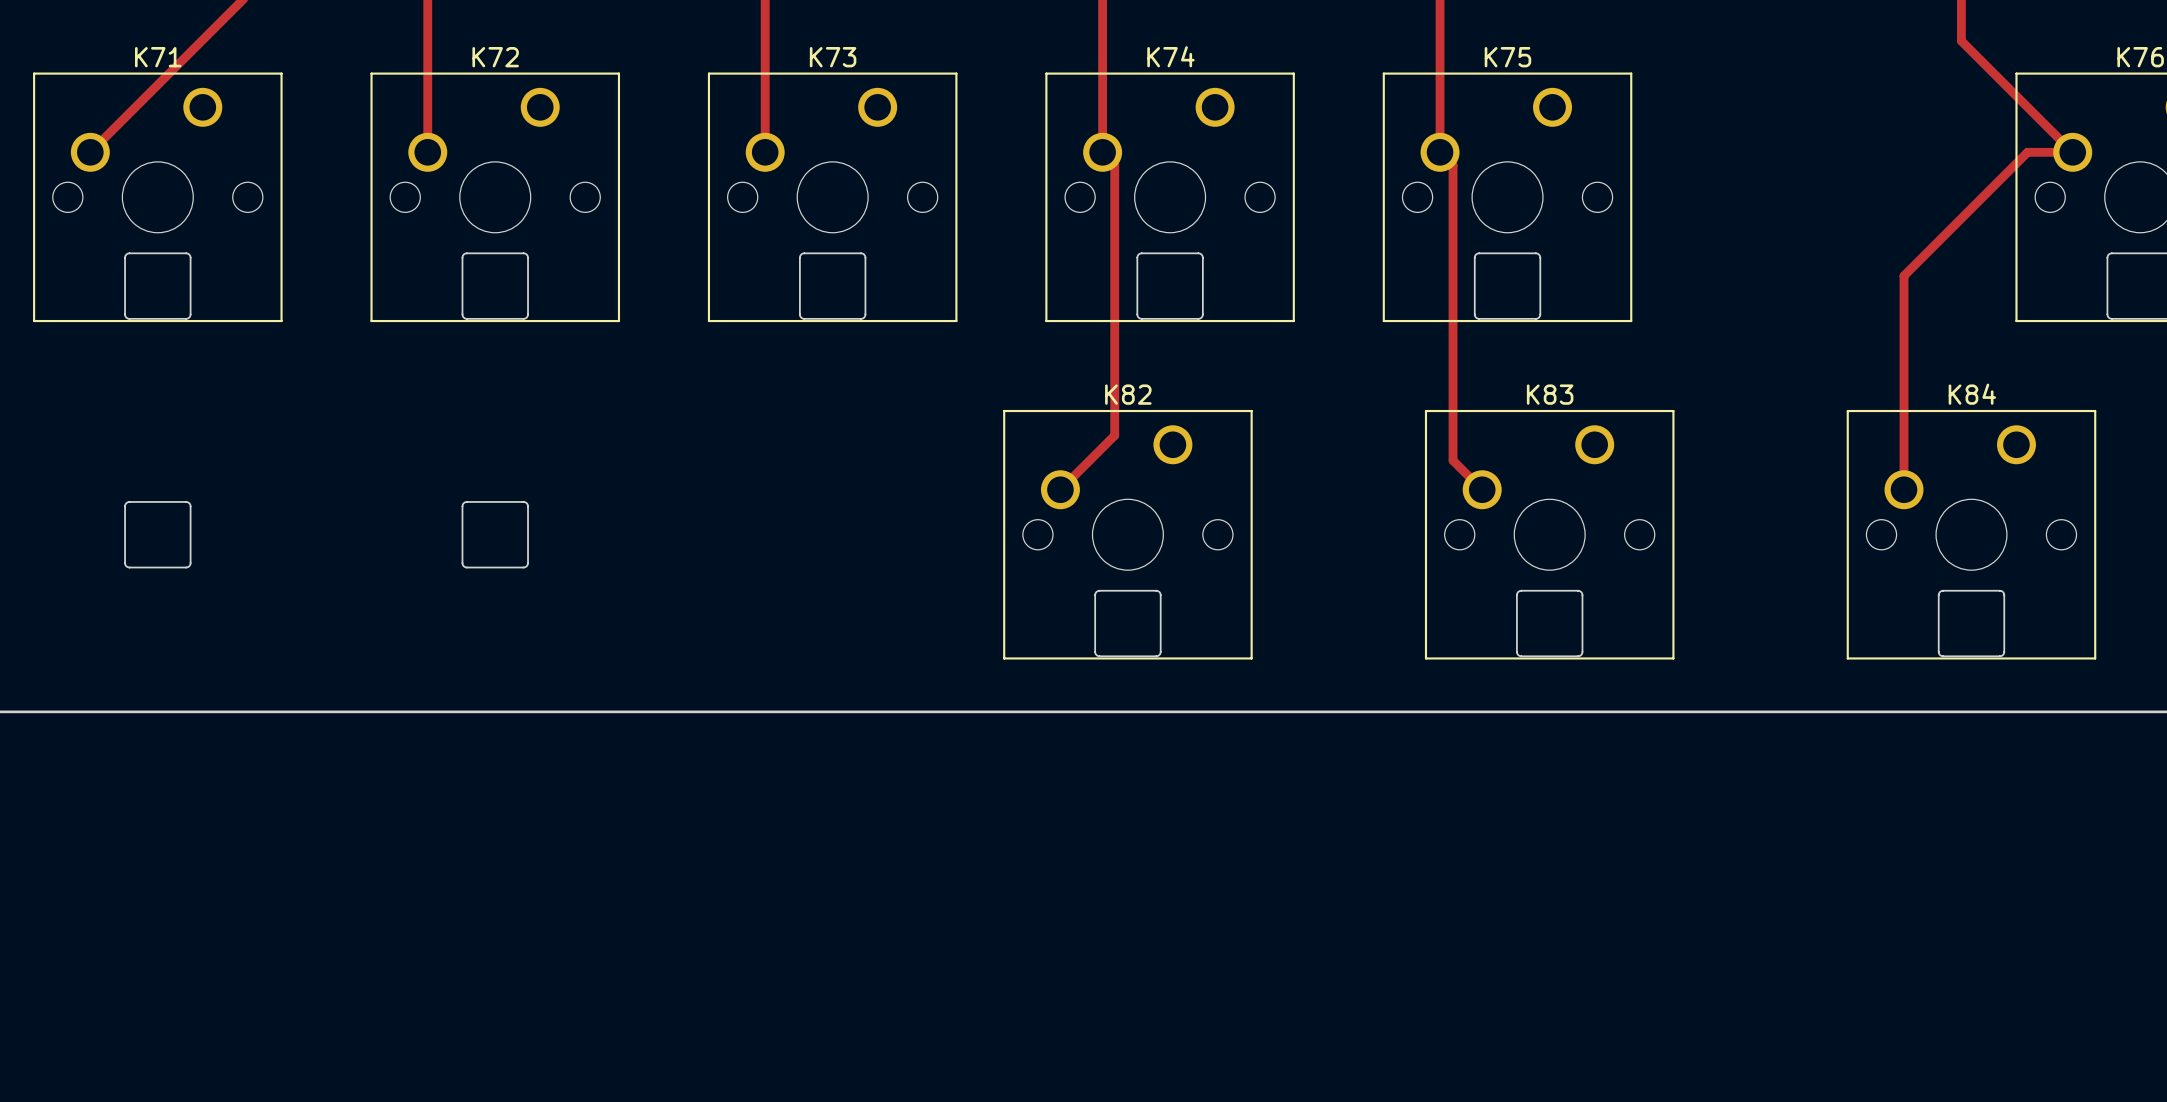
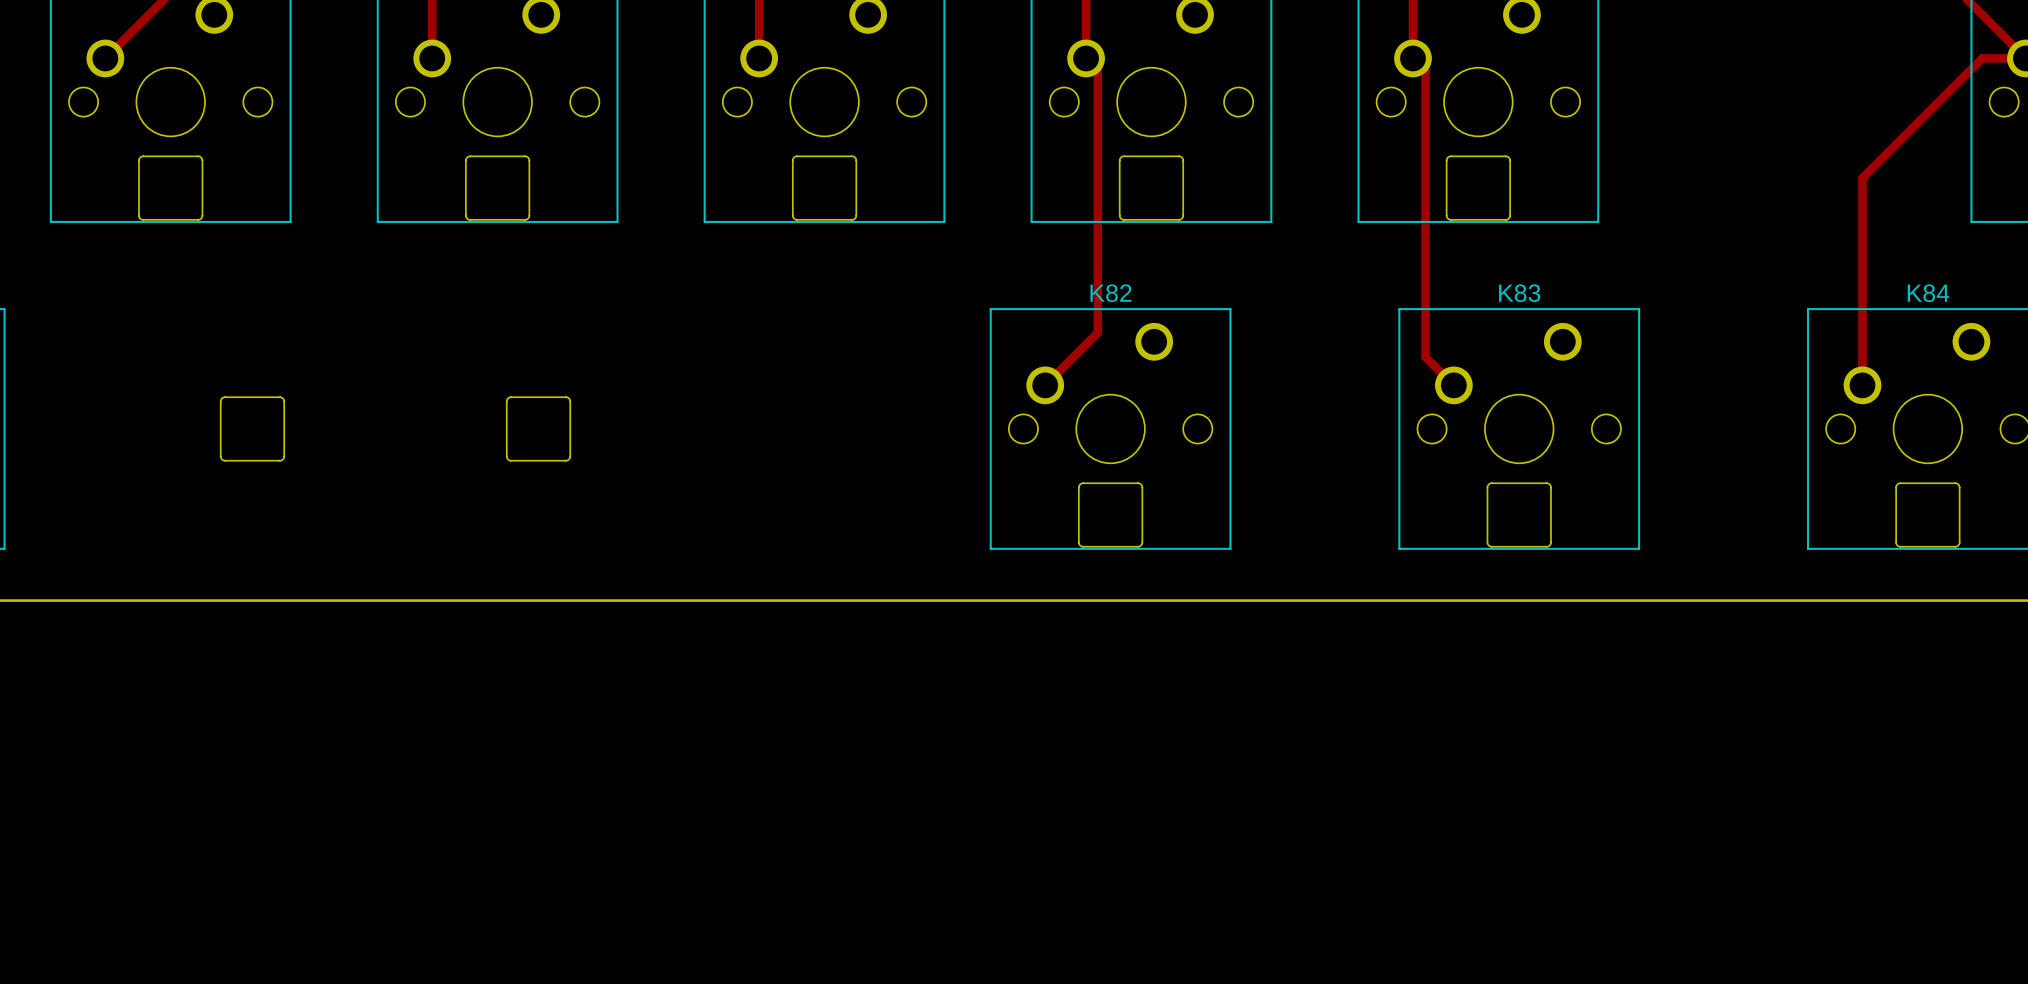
part position: (157, 534) -> (252, 428)
part position: (495, 534) -> (538, 428)

